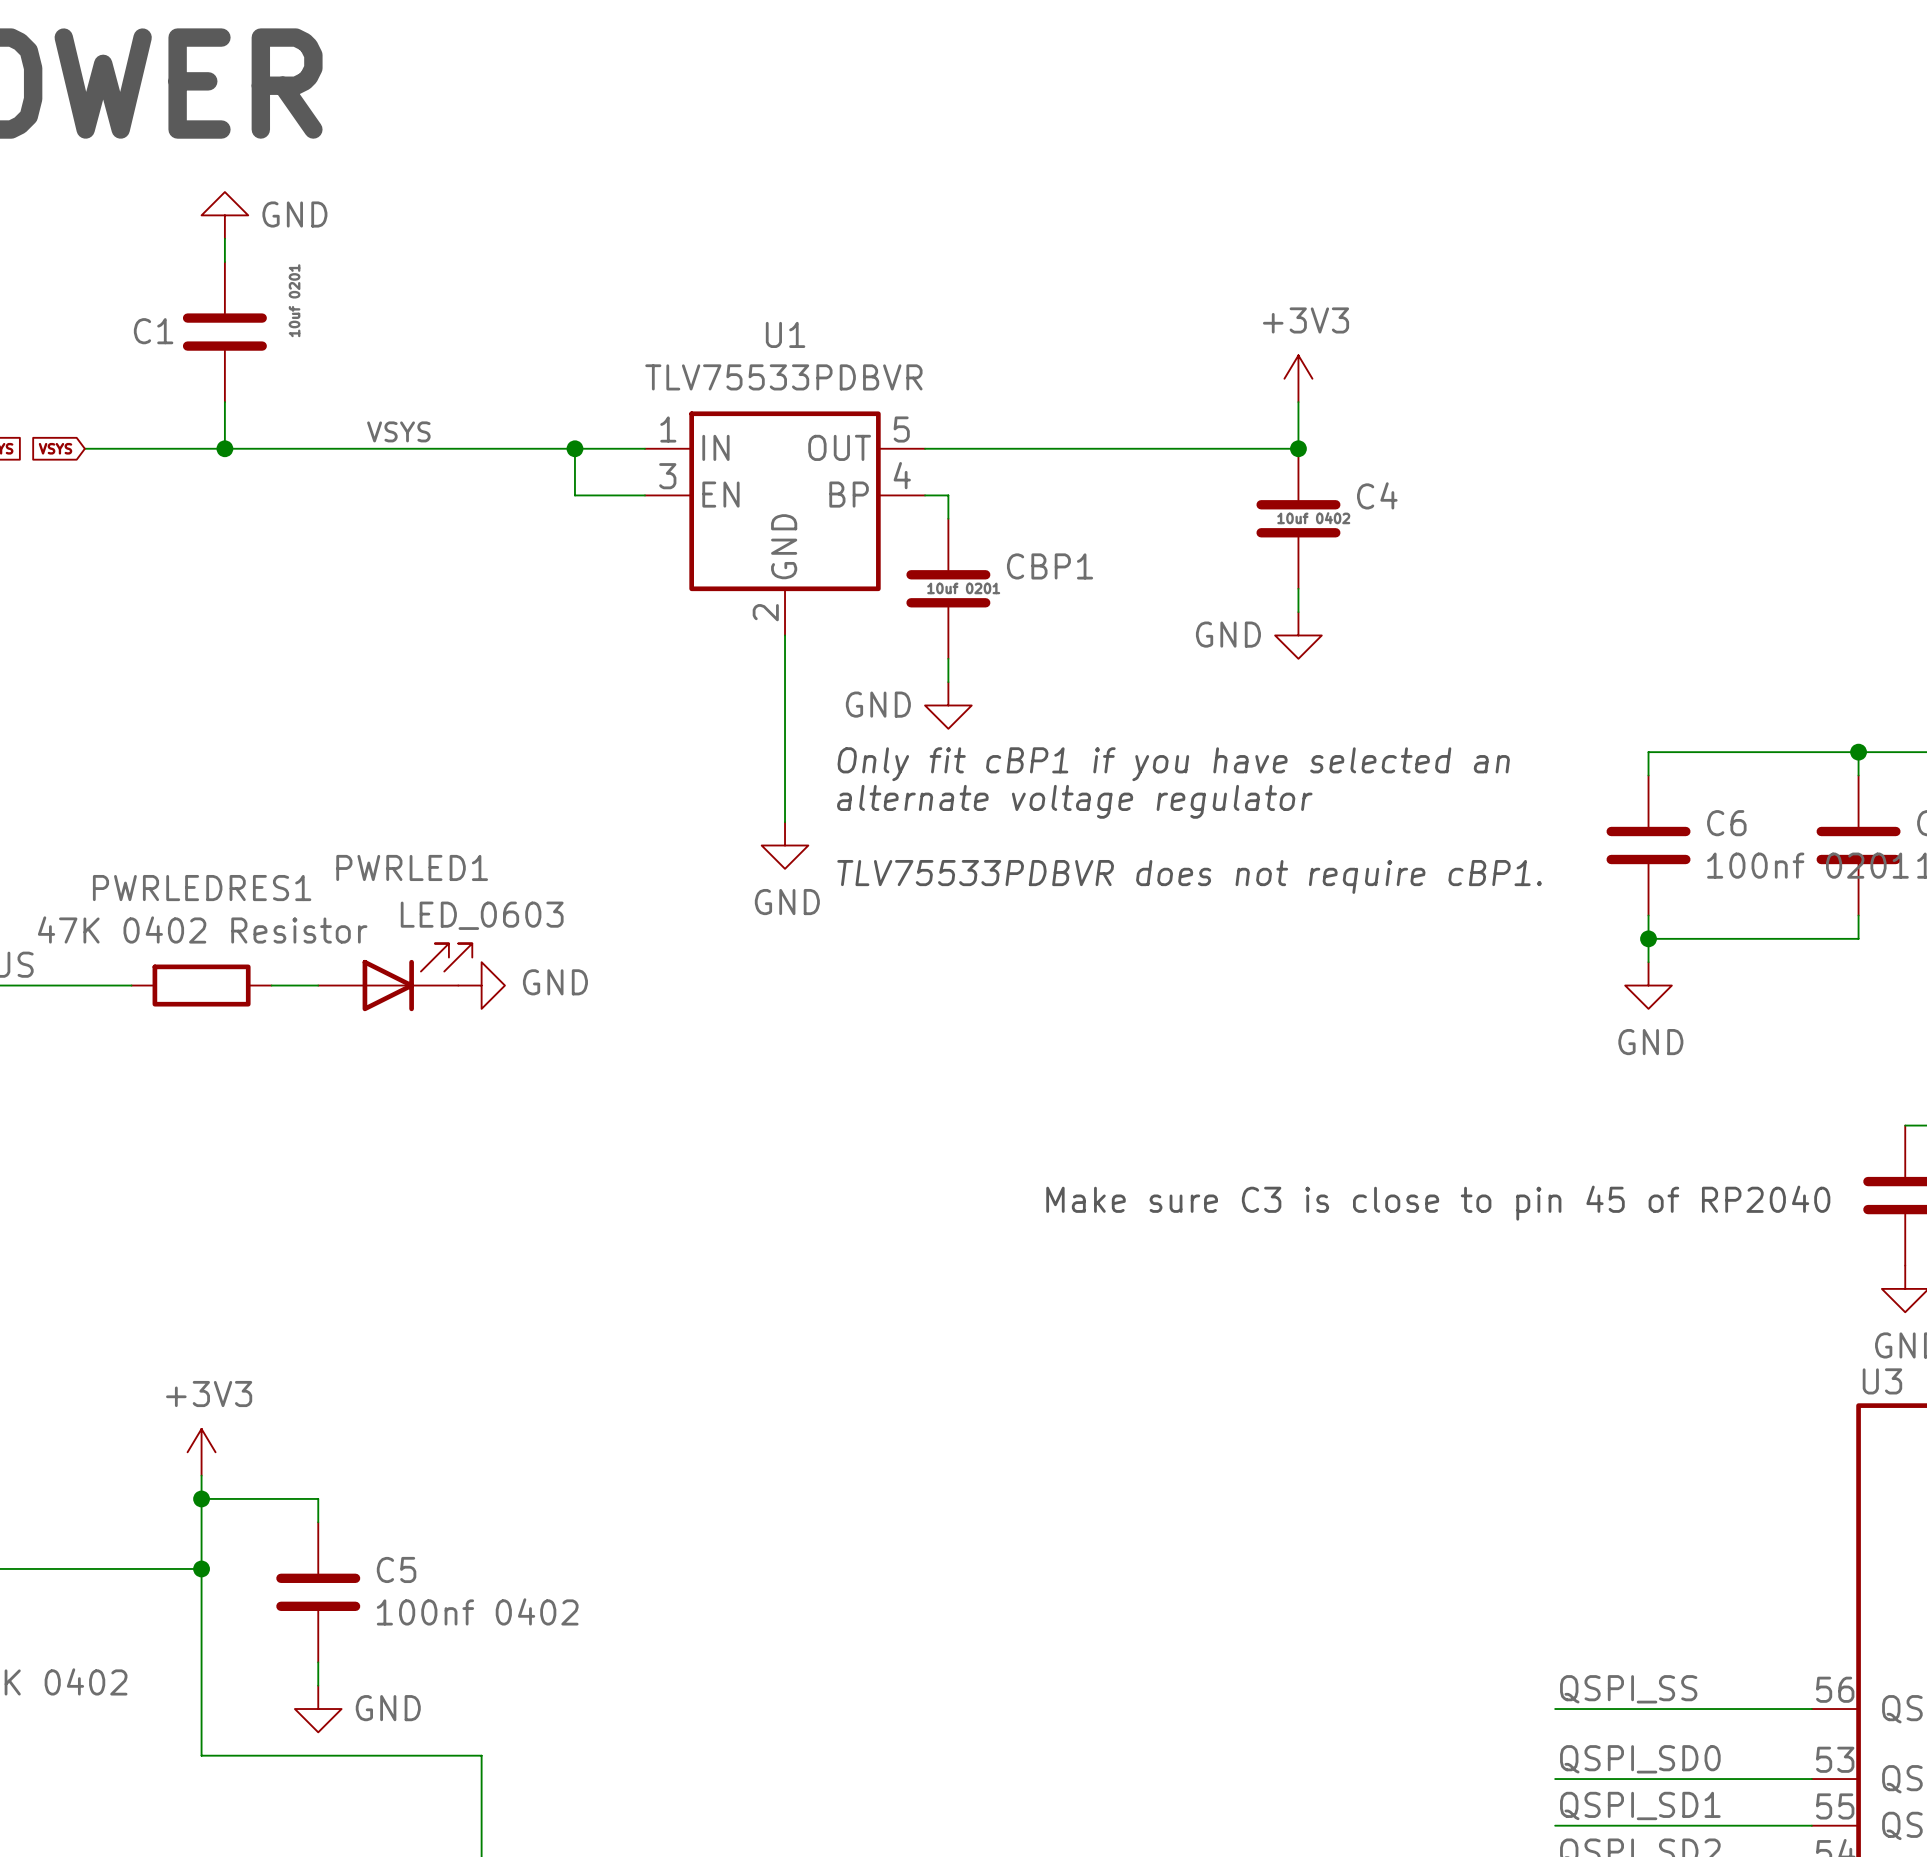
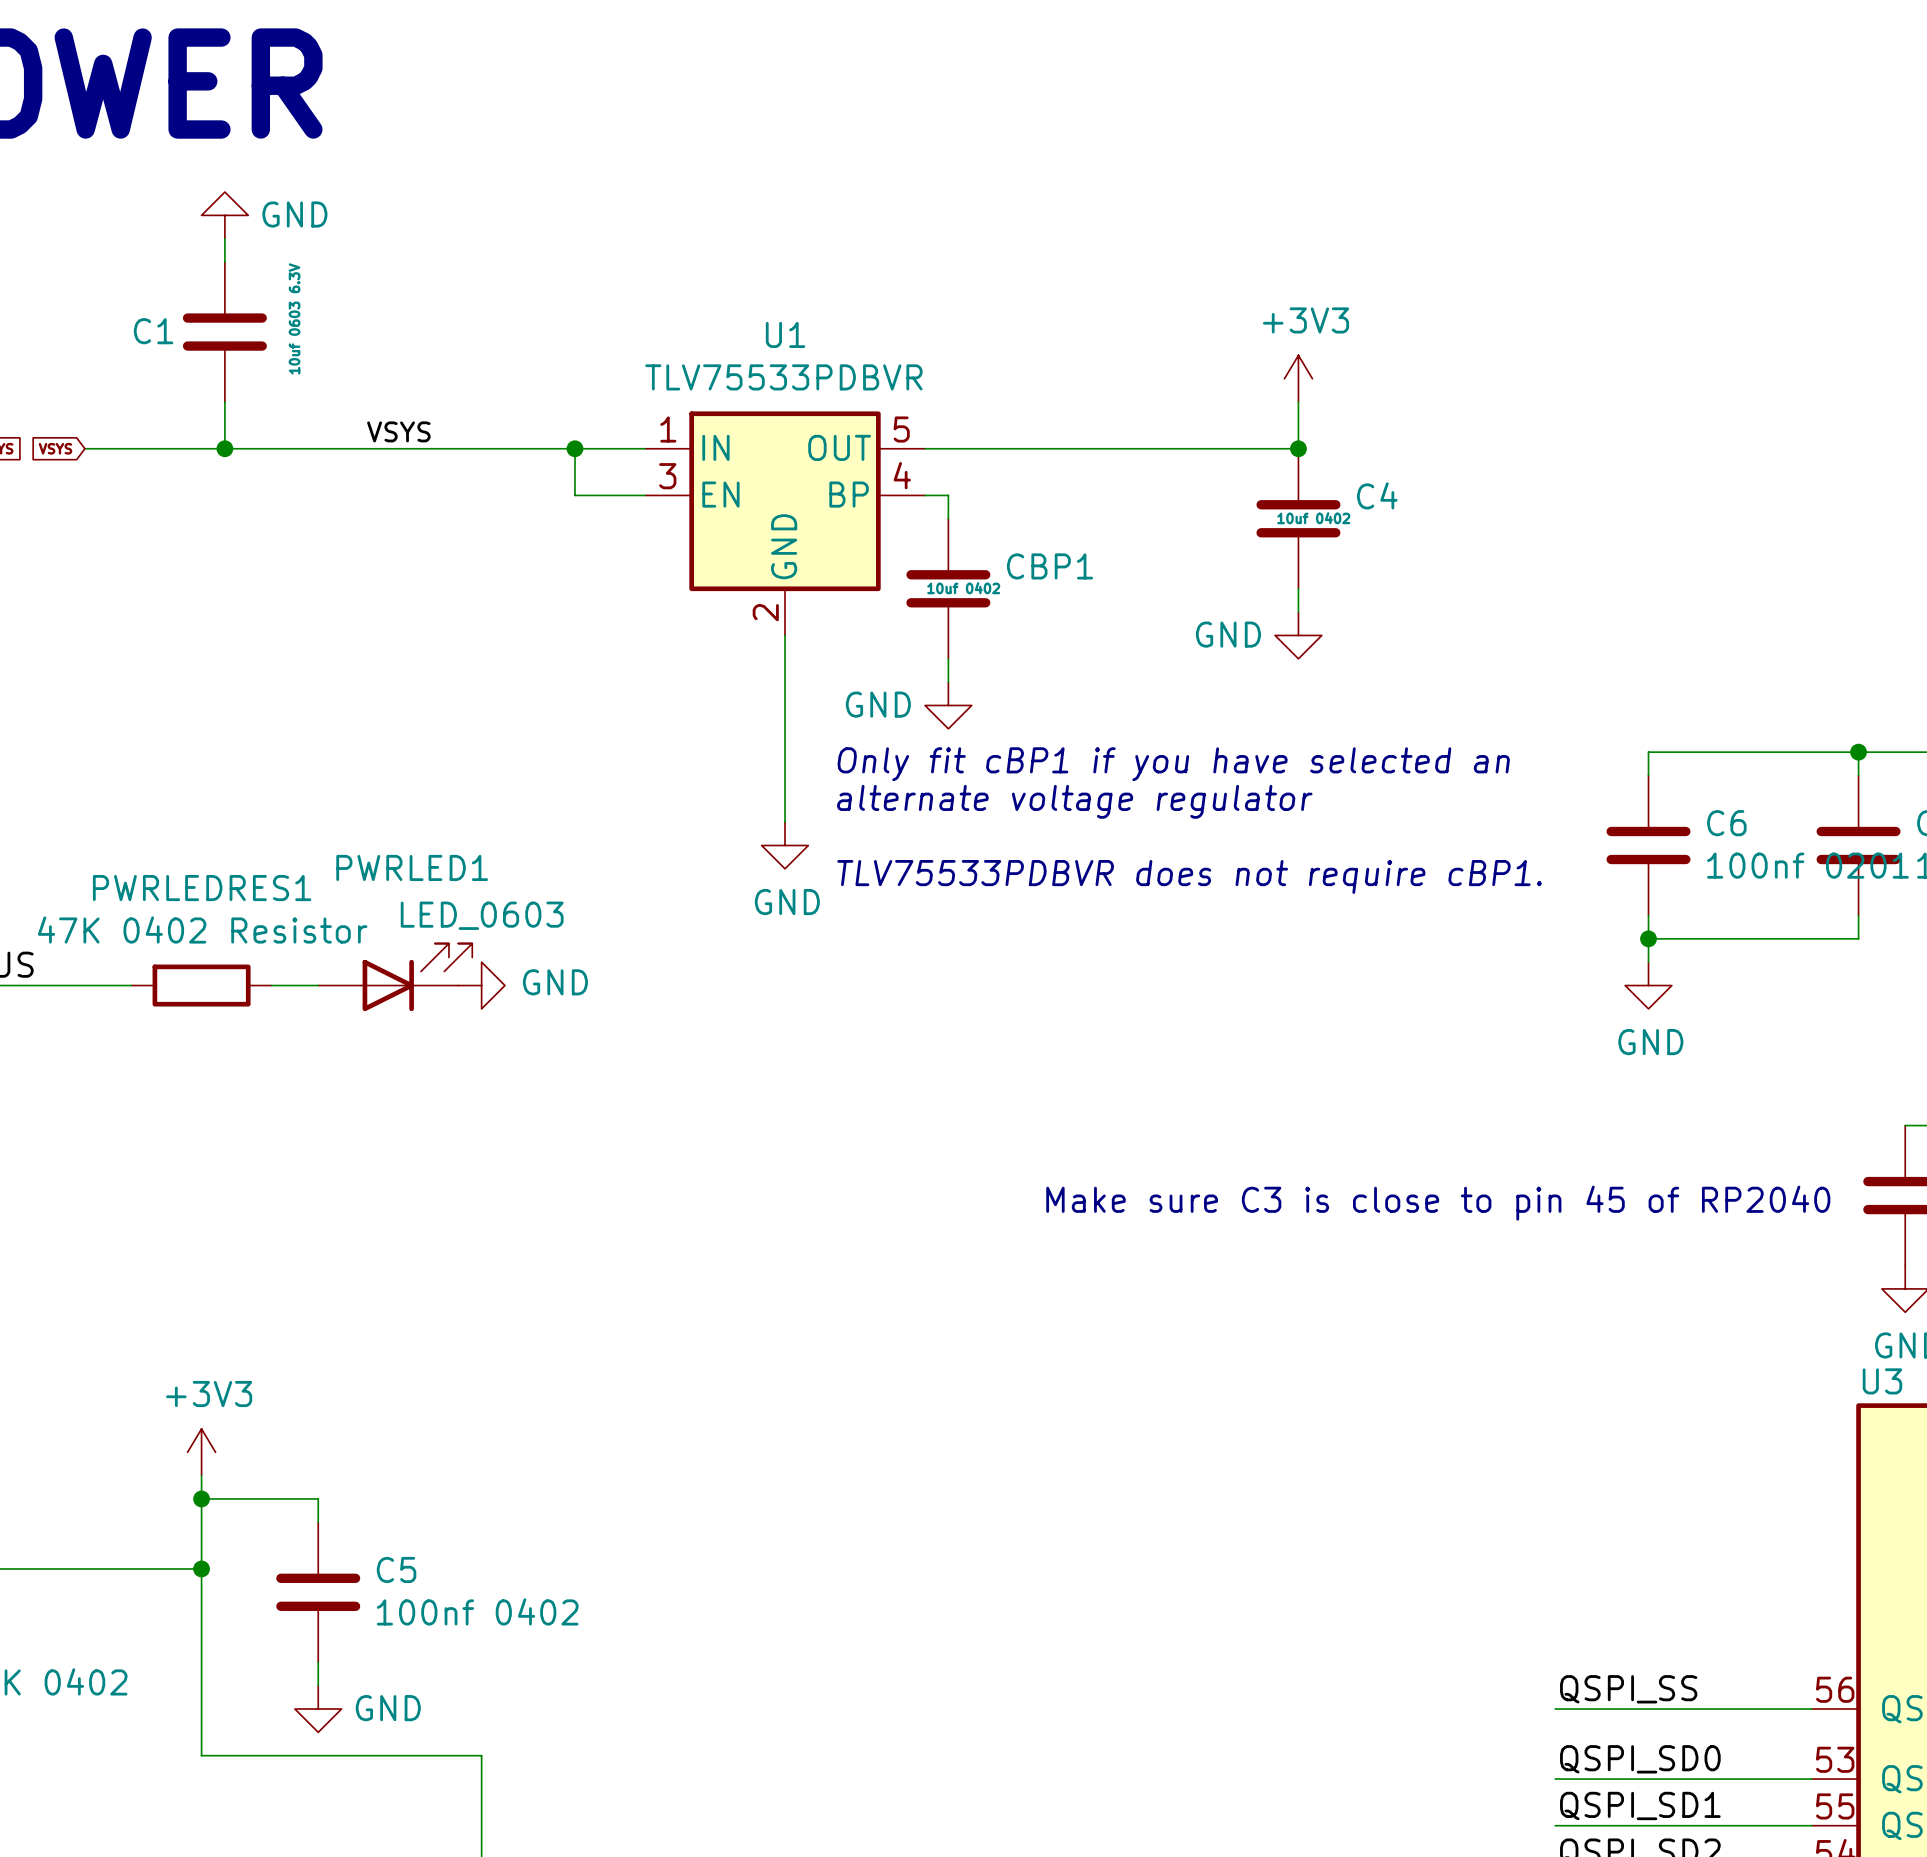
C1 value: 10uf 0201 (294, 300) -> 10uf 0603 6.3V (294, 318)
CBP1 value: 10uf 0201 (963, 588) -> 10uf 0402 (963, 588)

